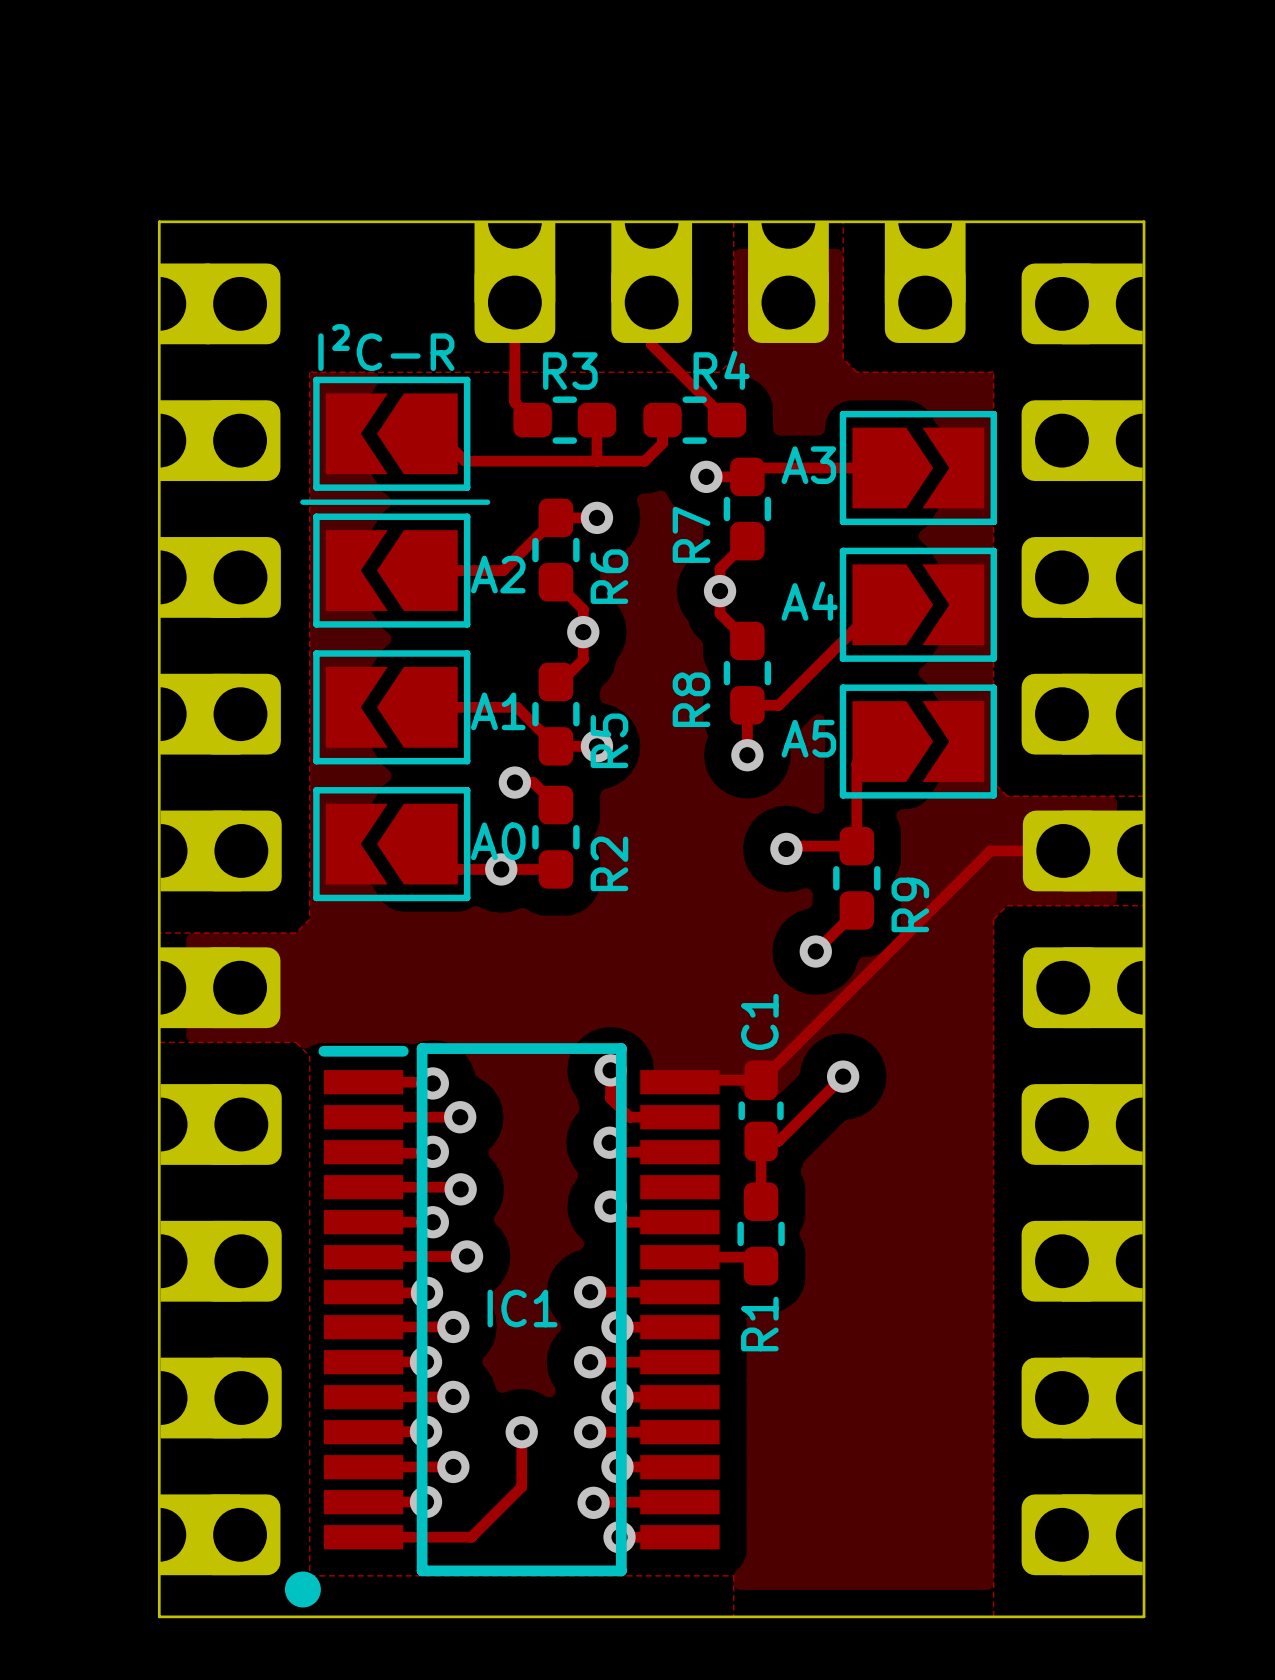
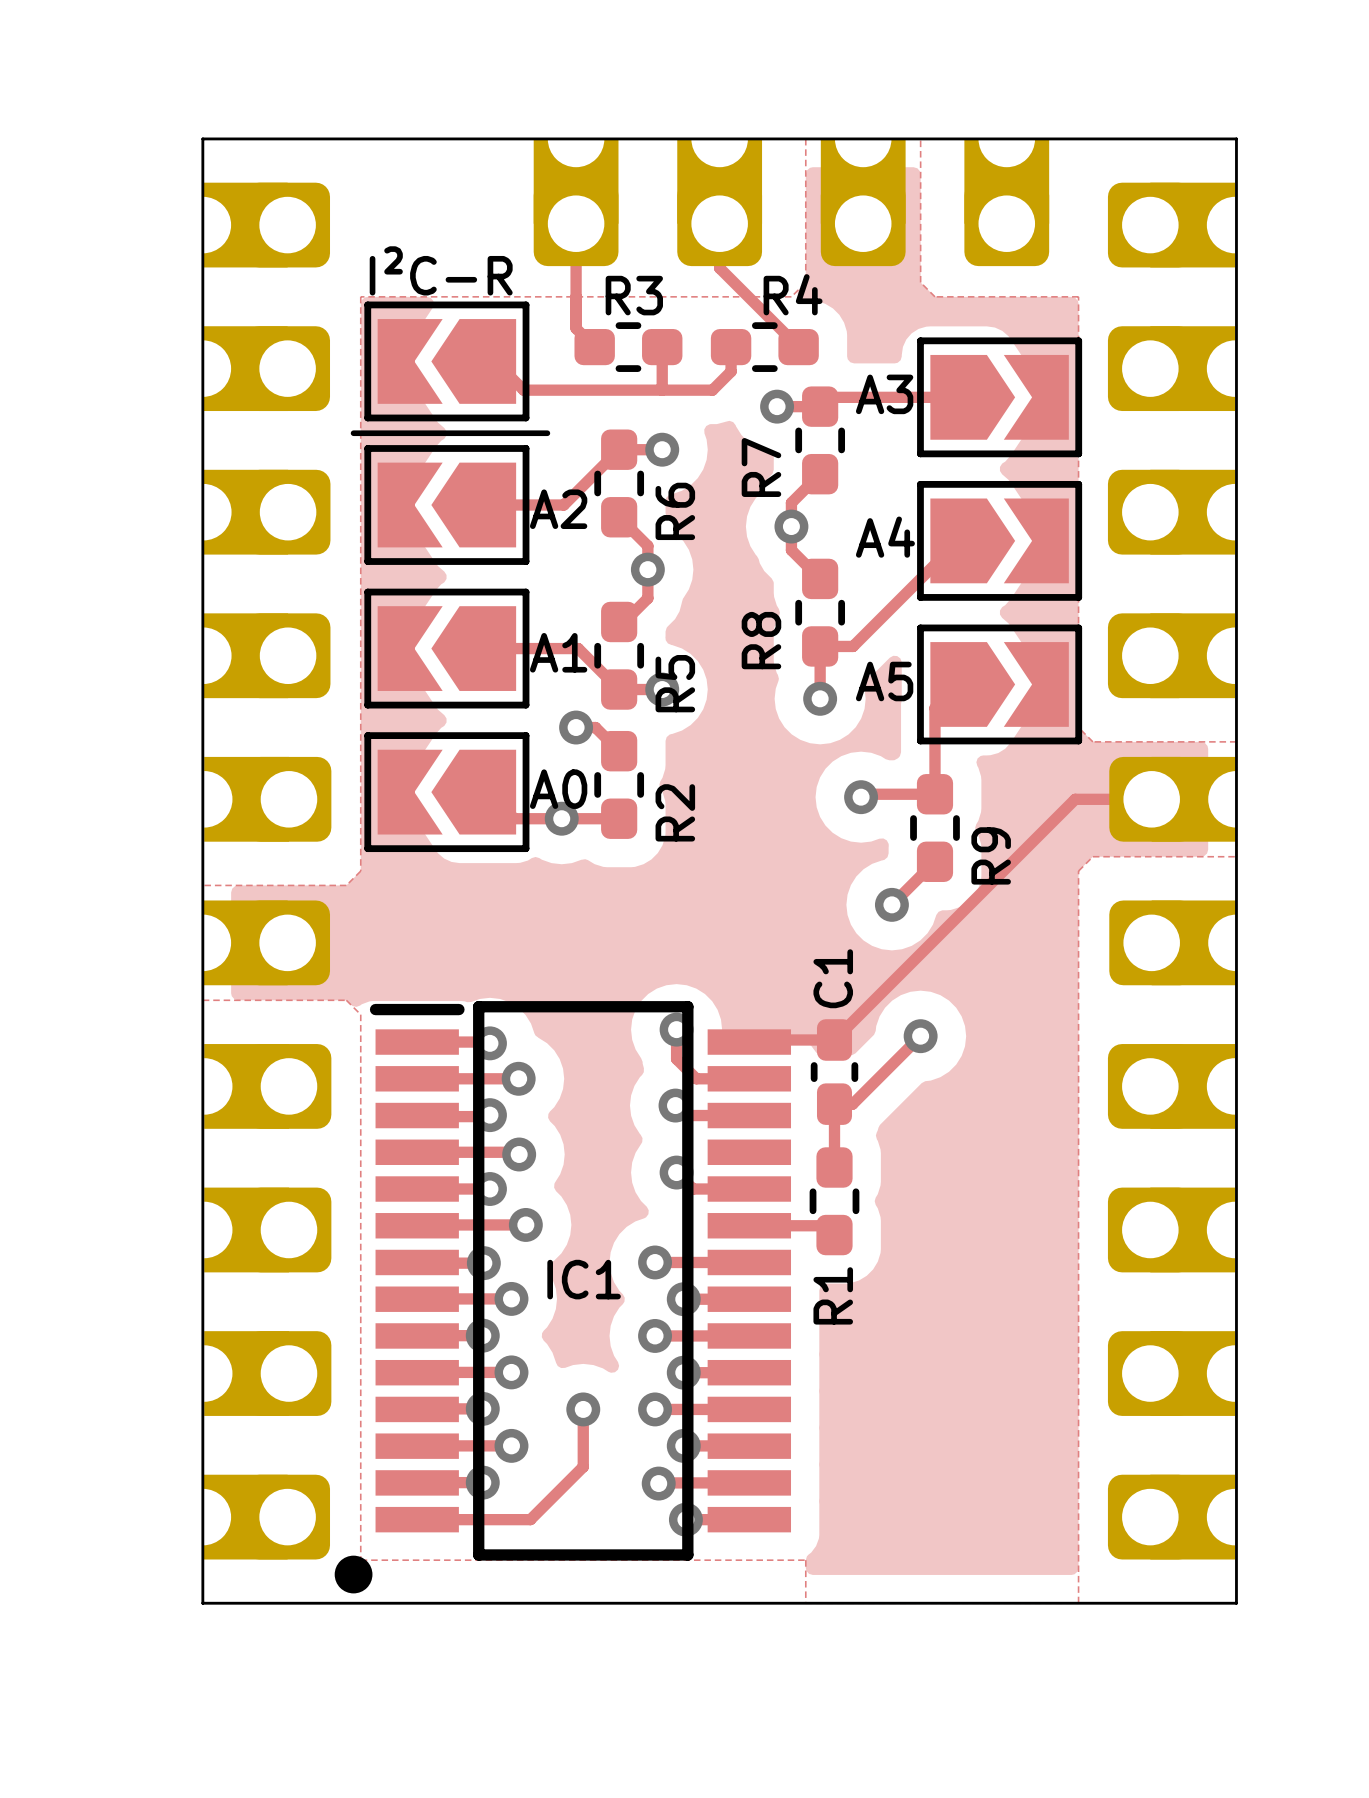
part footprint: [132, 263, 281, 345] -> [174, 182, 331, 268]

